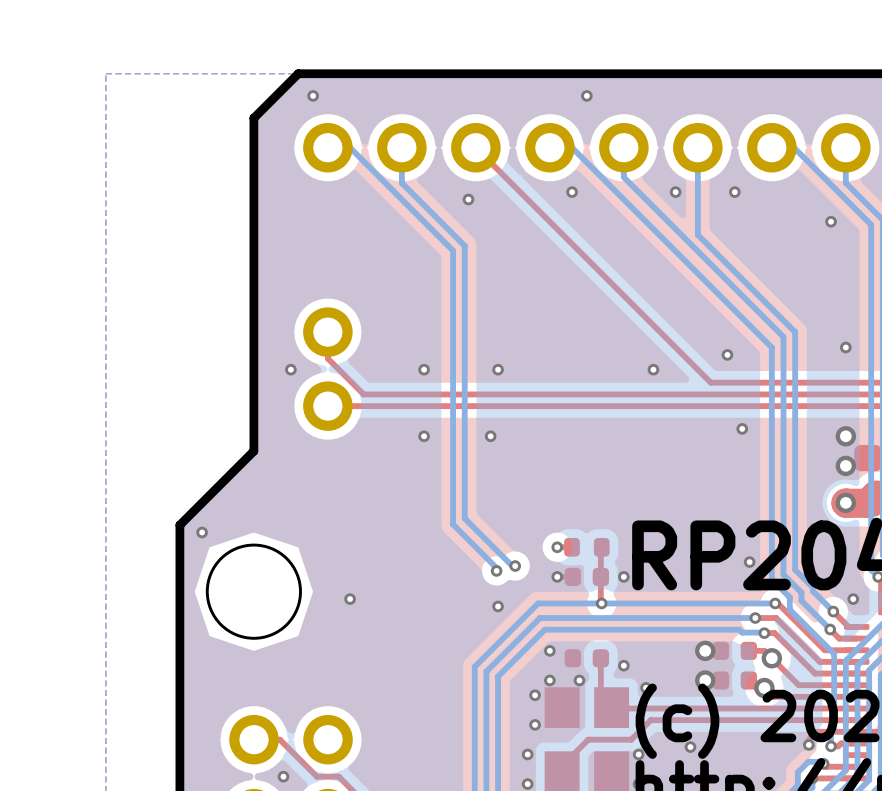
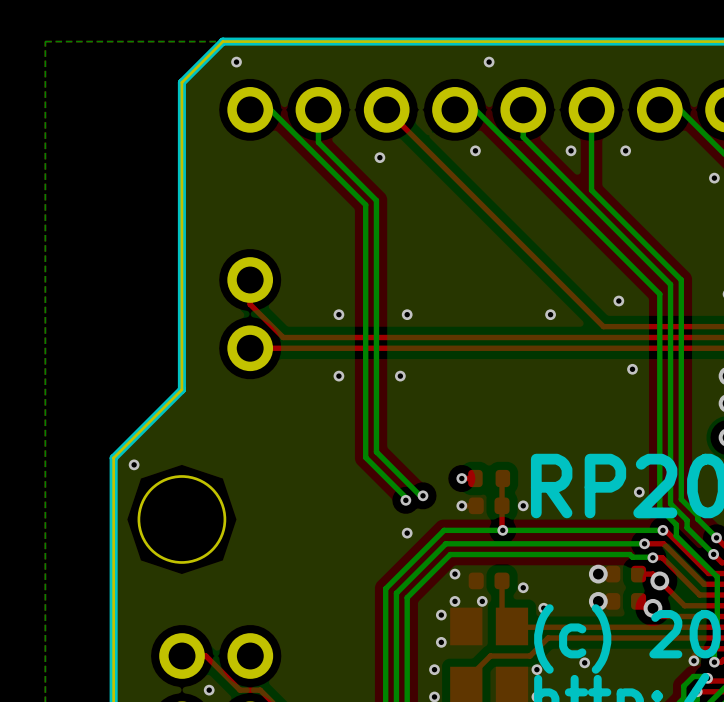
via: (290, 369) -> none
via: (350, 599) -> none

